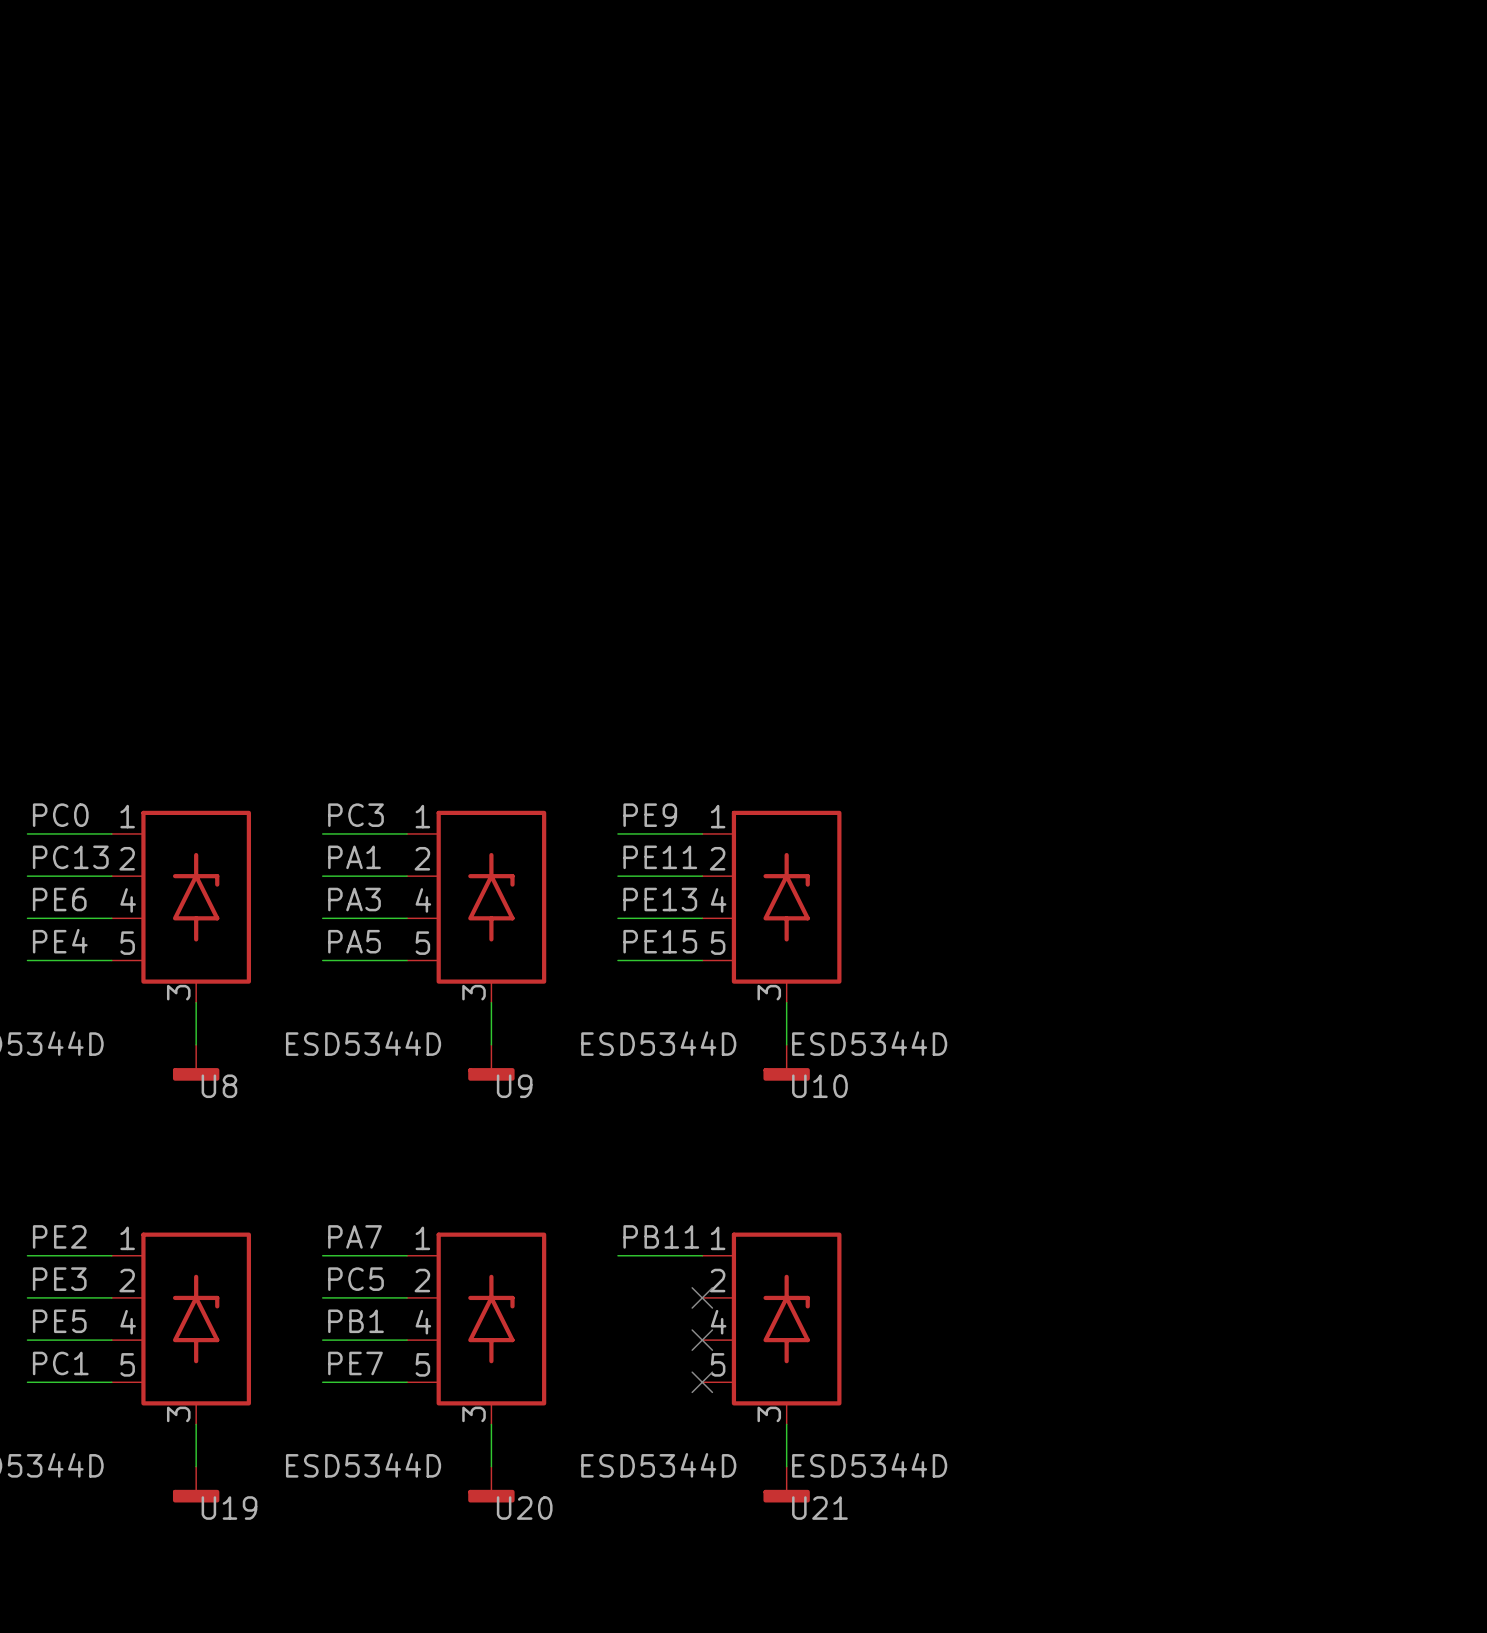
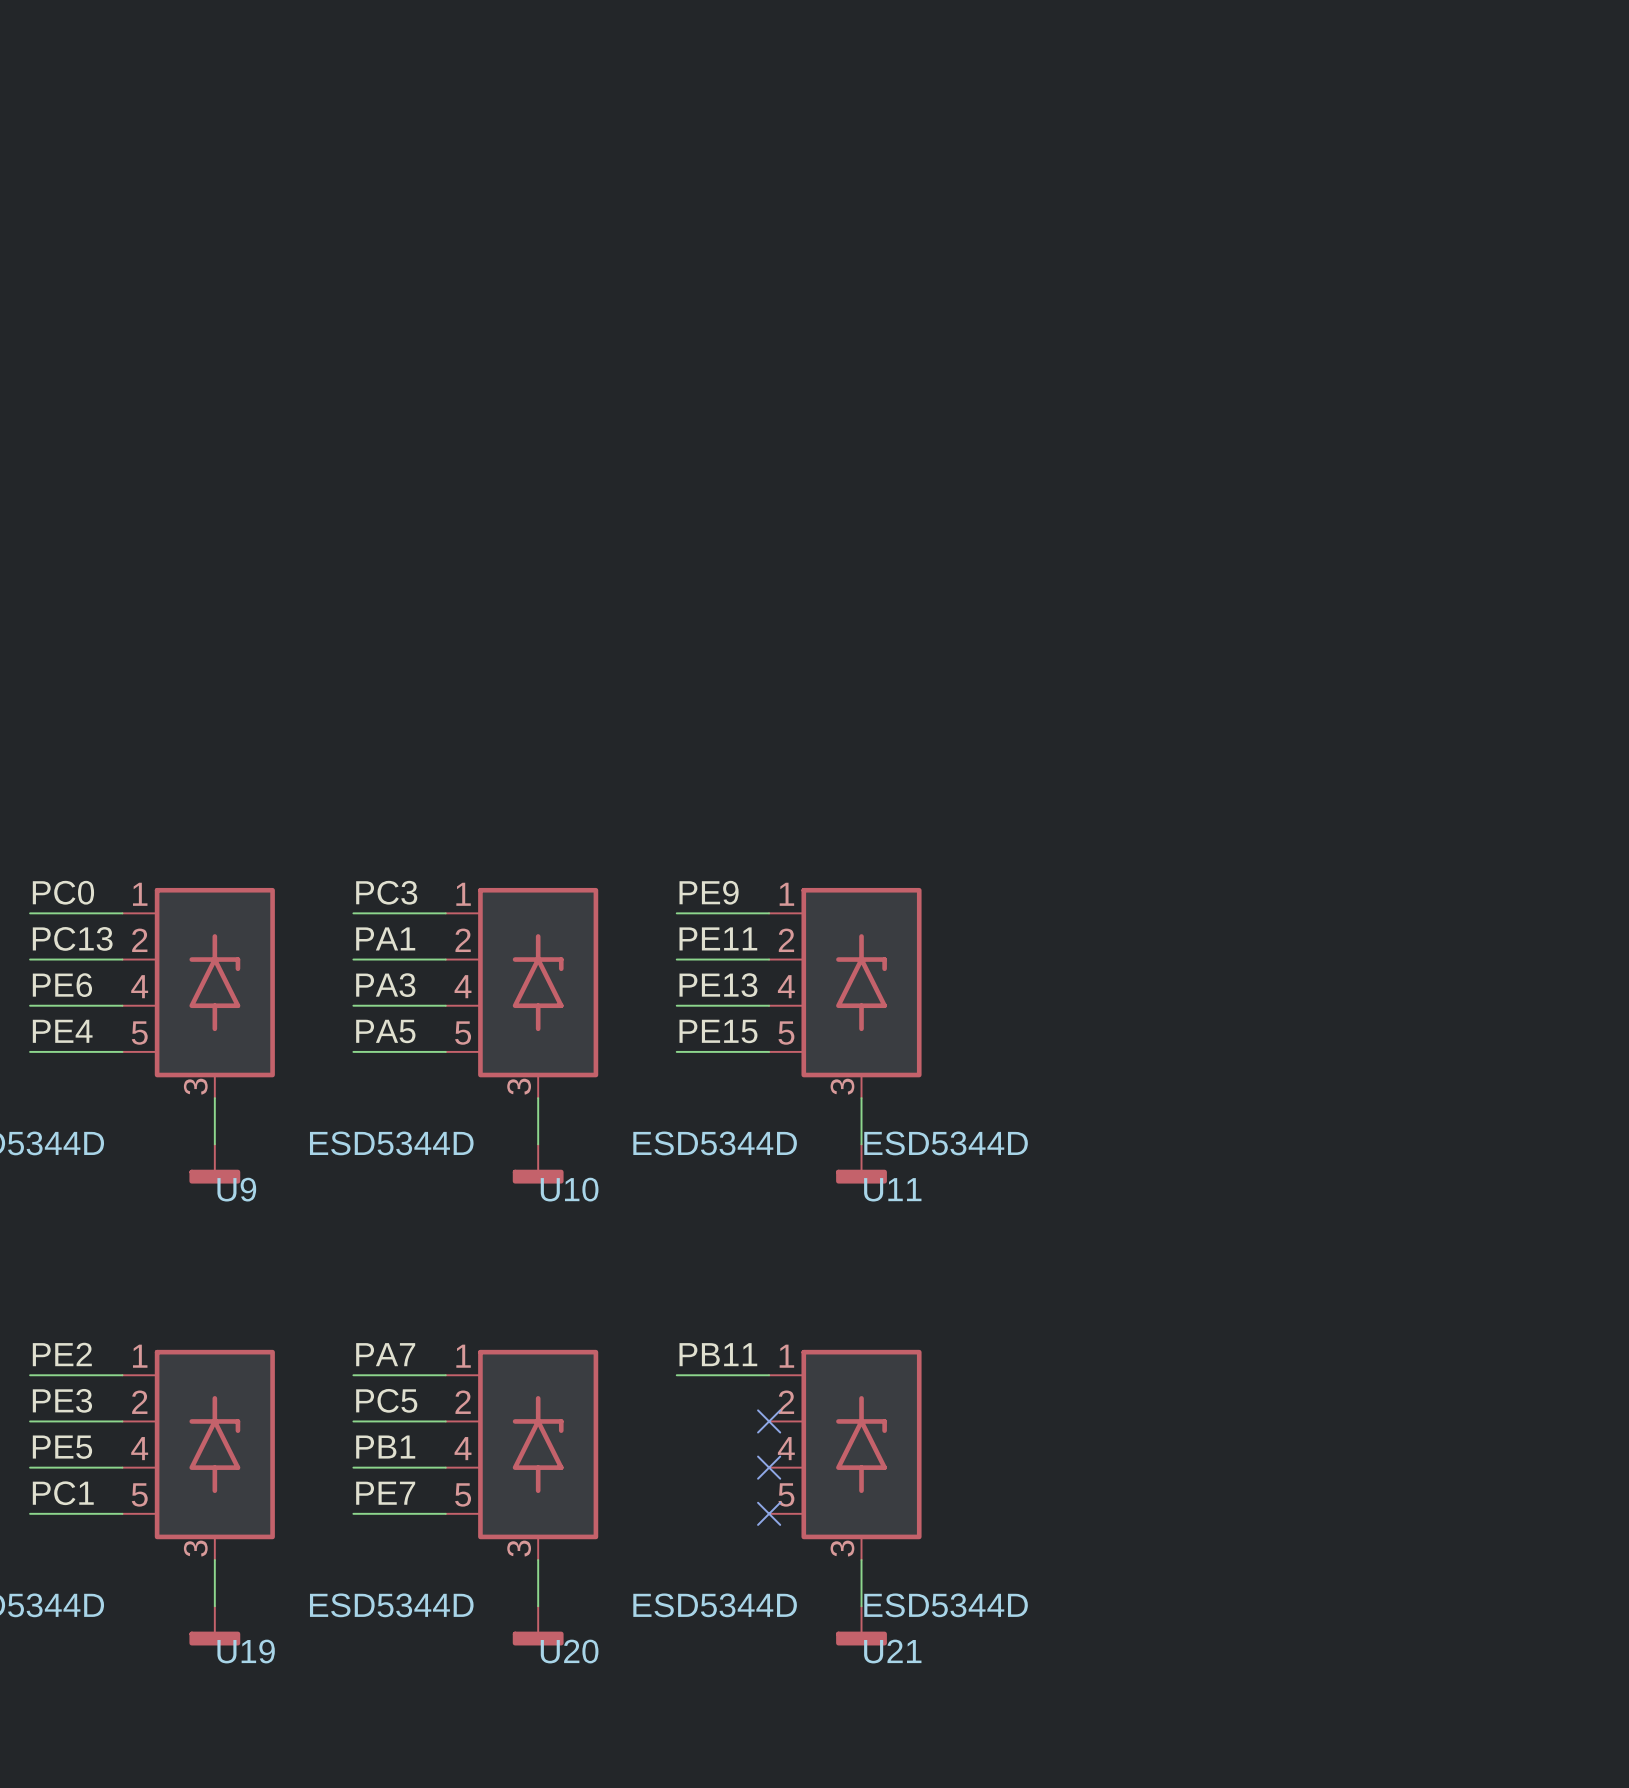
U8 name: U8 (219, 1086) -> U9 (236, 1189)
U9 name: U9 (514, 1086) -> U10 (569, 1189)
U10 name: U10 (819, 1086) -> U11 (892, 1189)

